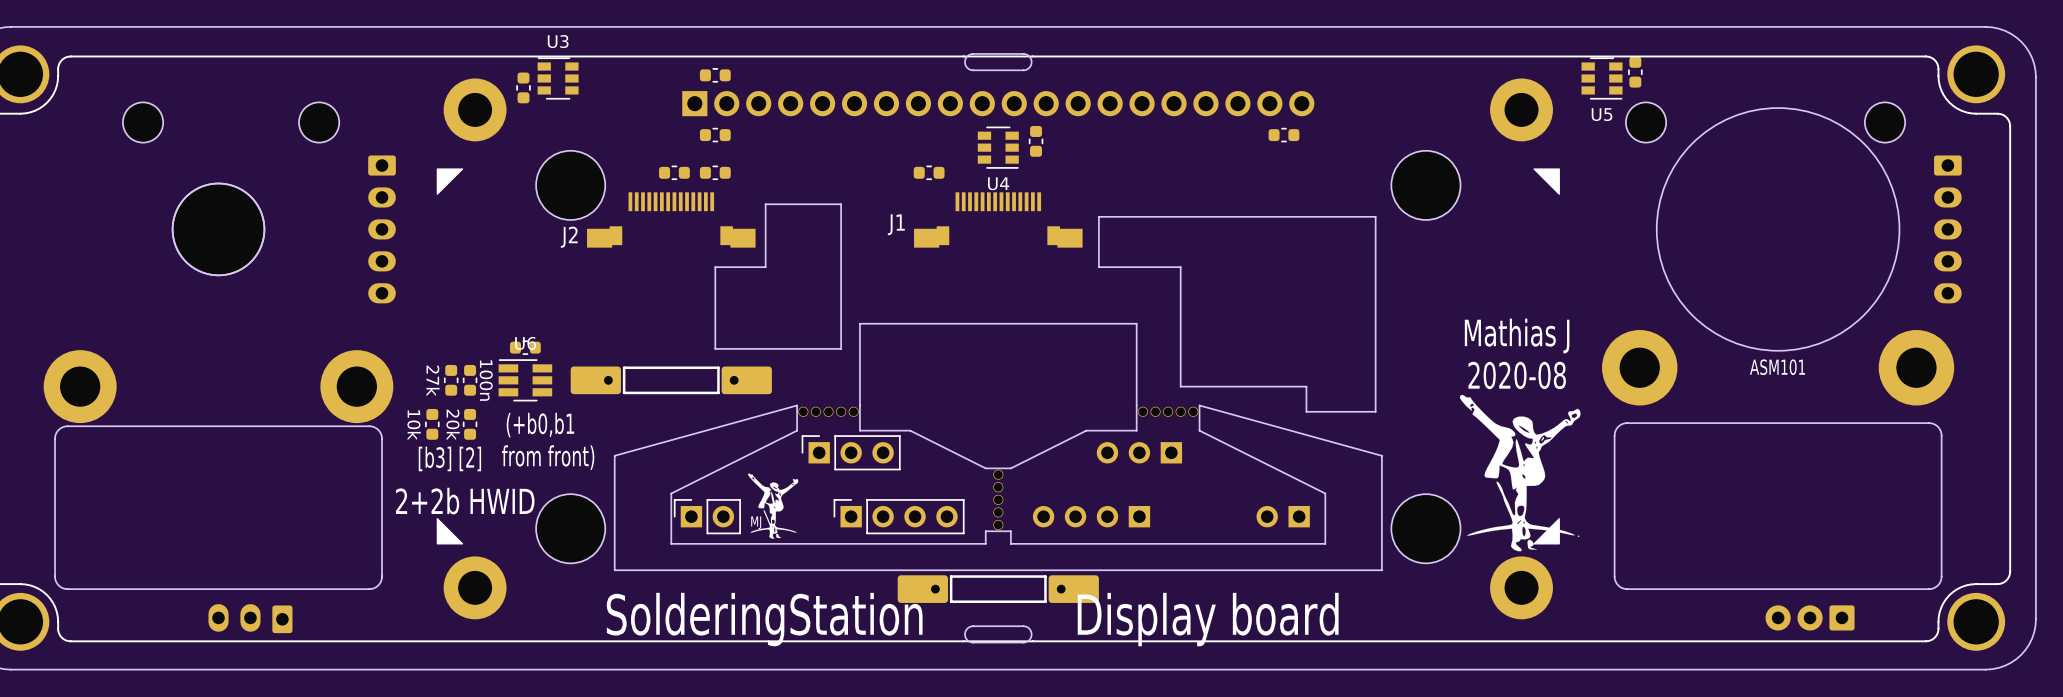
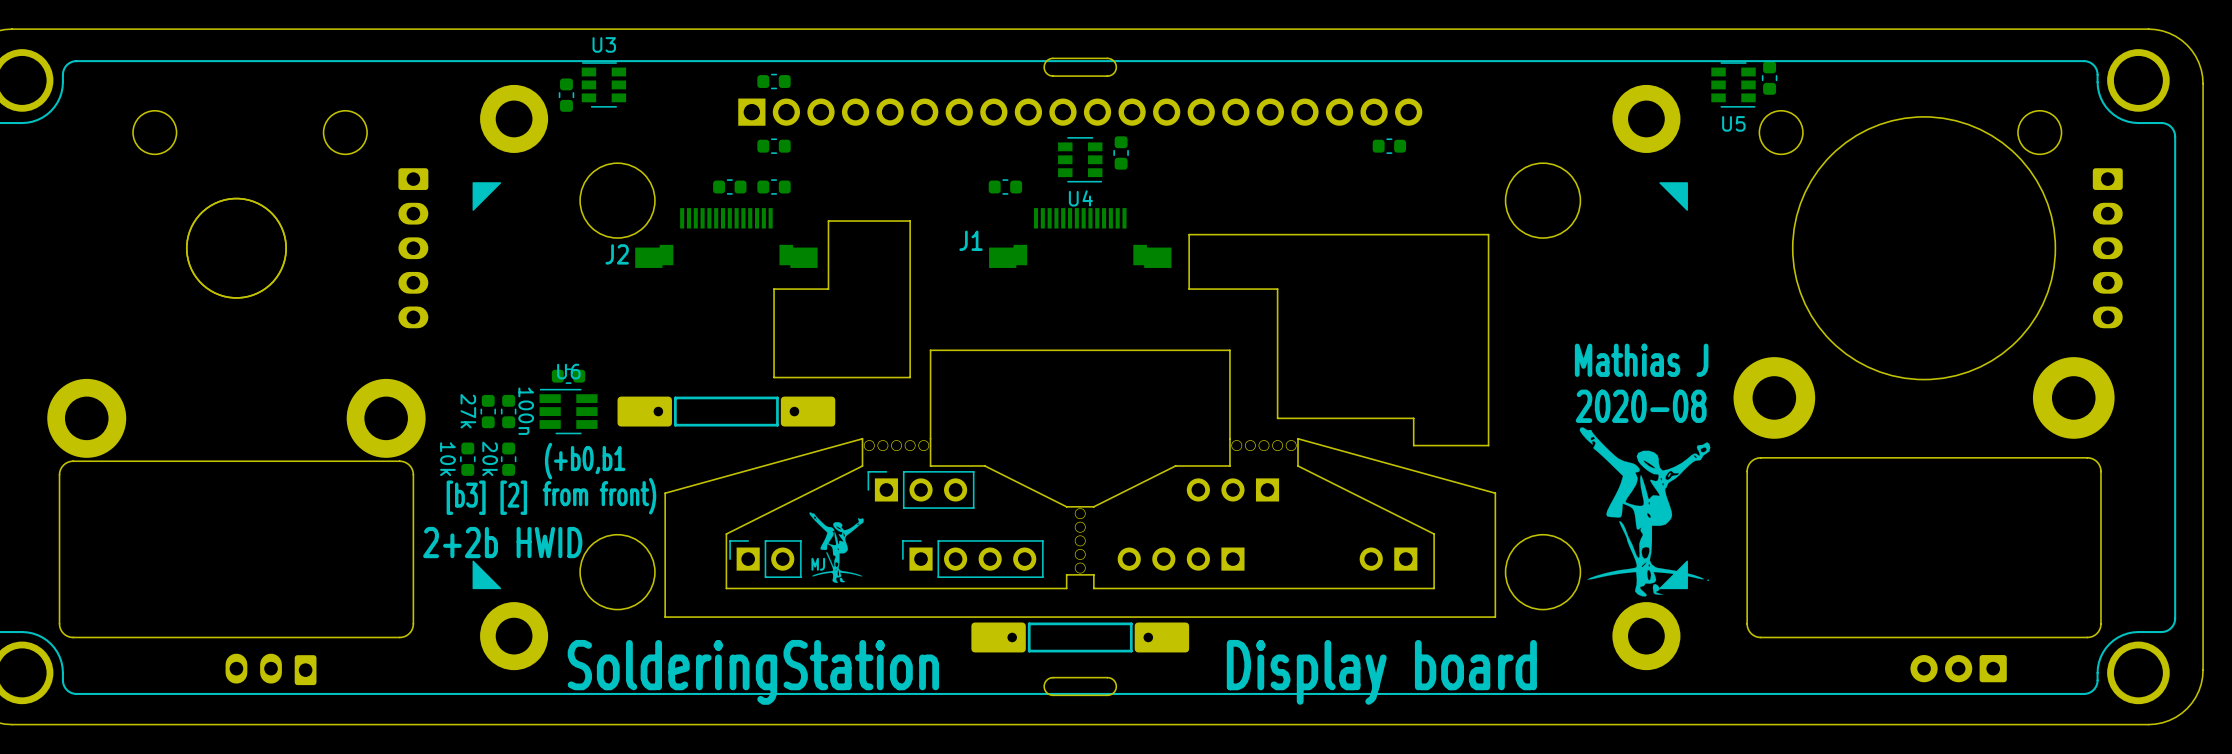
ASM101 name: ASM101 (1777, 367) -> none

